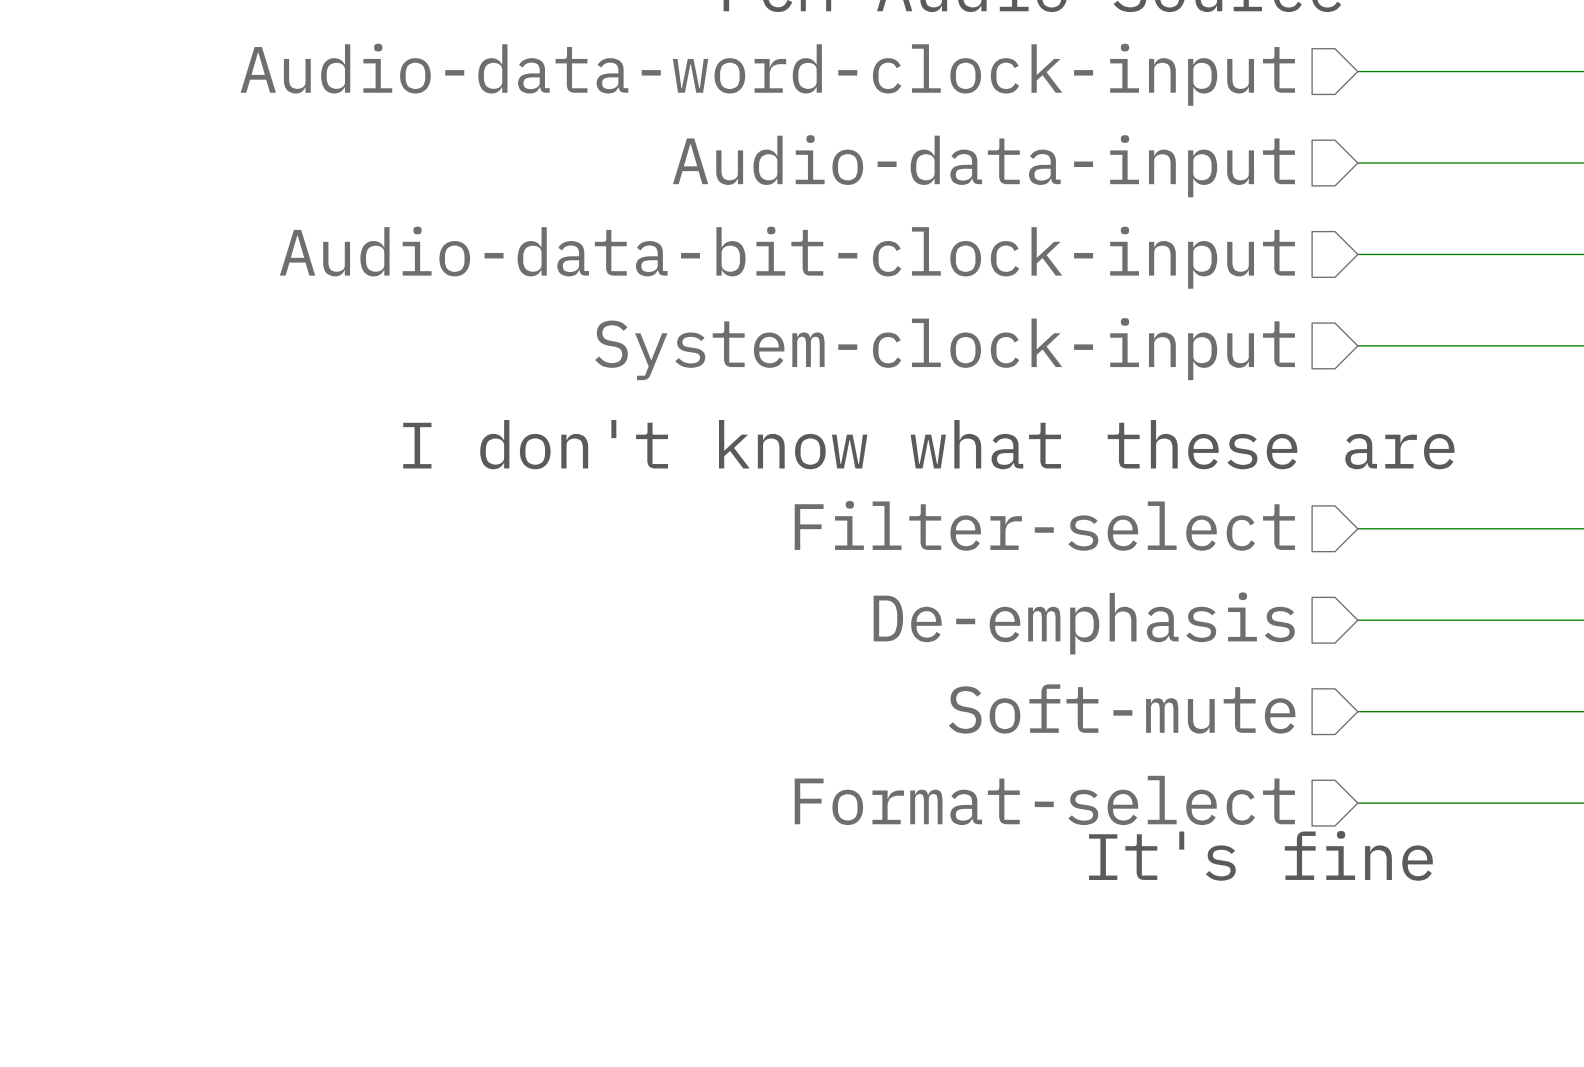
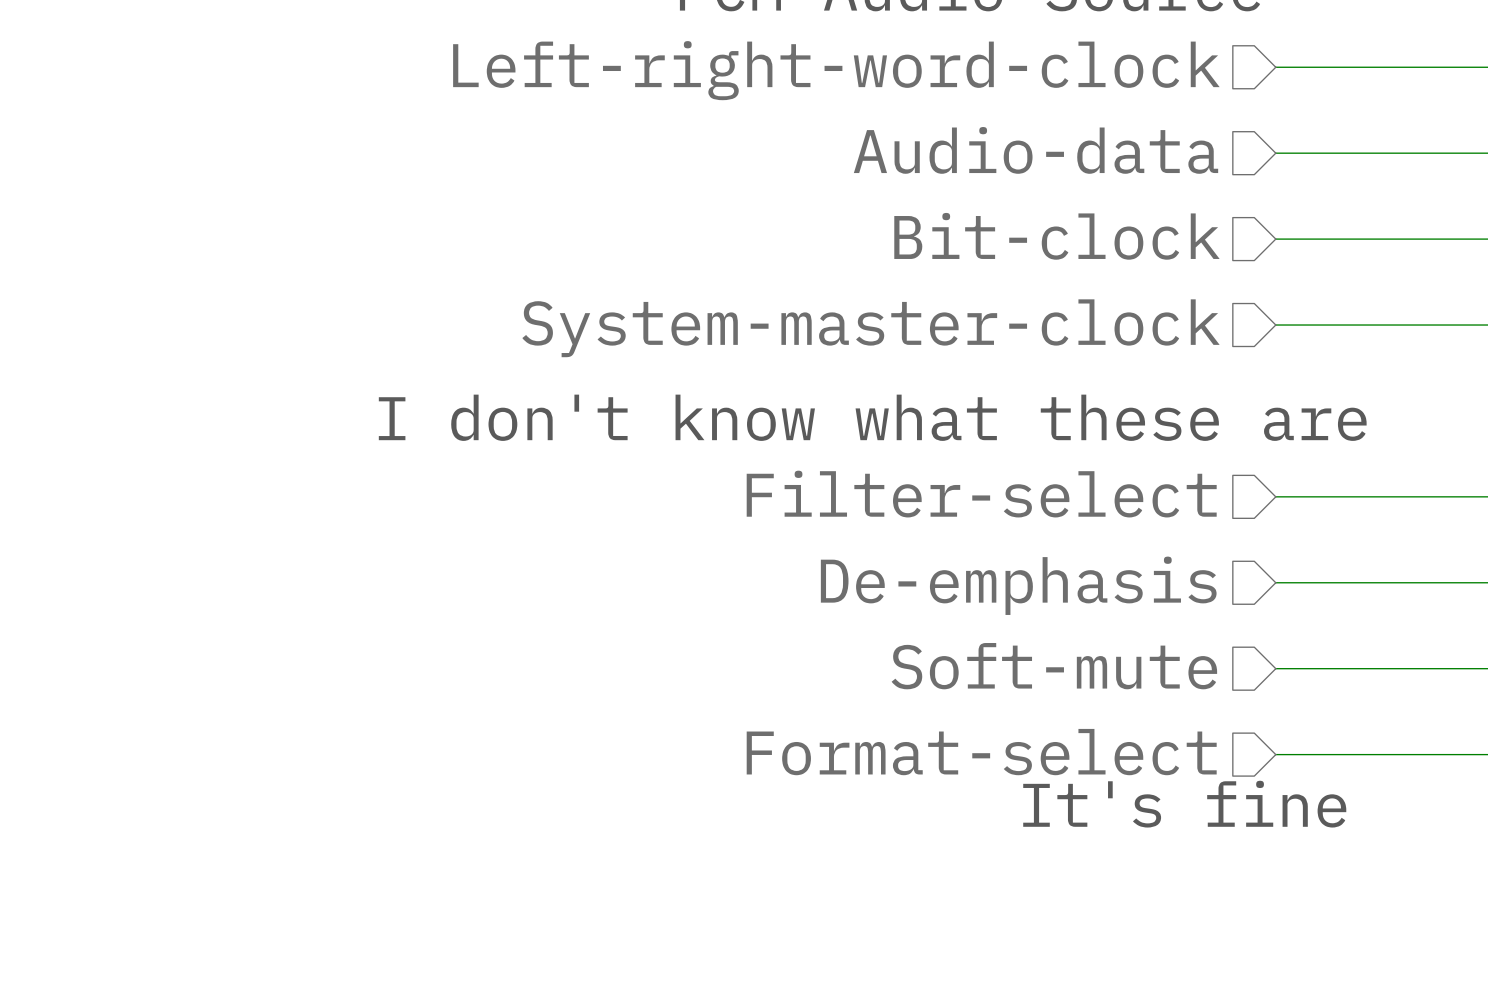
hierarchical label: Audio-data-word-clock-input (767, 74) -> Left-right-word-clock (836, 70)
hierarchical label: Audio-data-input (983, 166) -> Audio-data (1036, 150)
hierarchical label: Audio-data-bit-clock-input (787, 257) -> Bit-clock (1056, 236)
hierarchical label: System-clock-input (945, 349) -> System-master-clock (870, 328)

